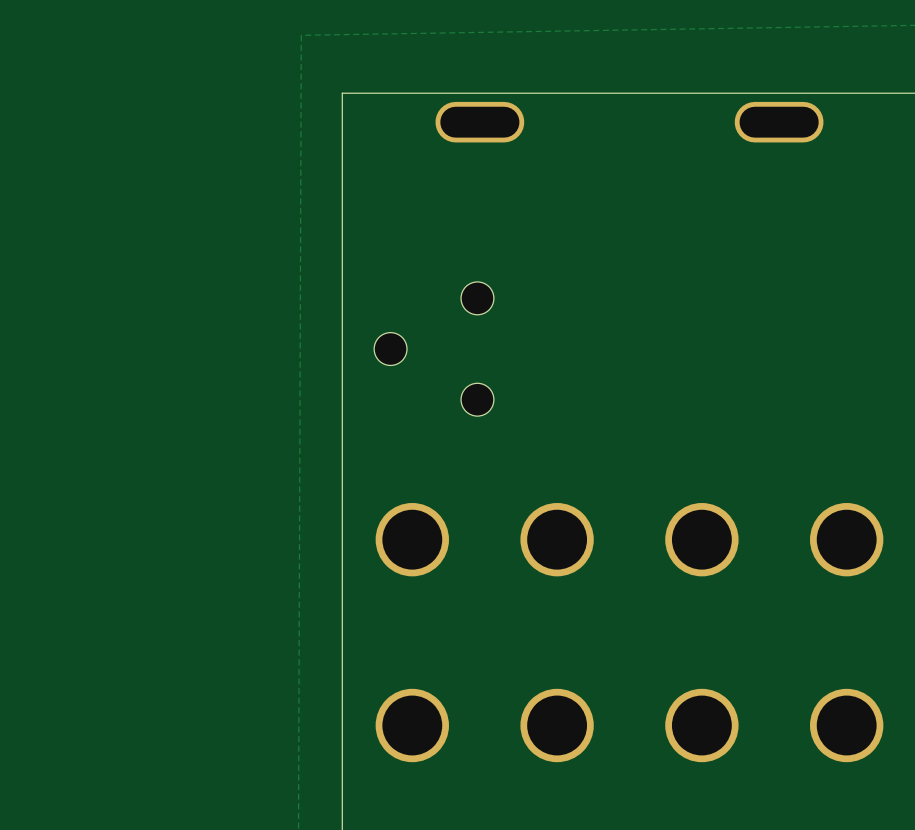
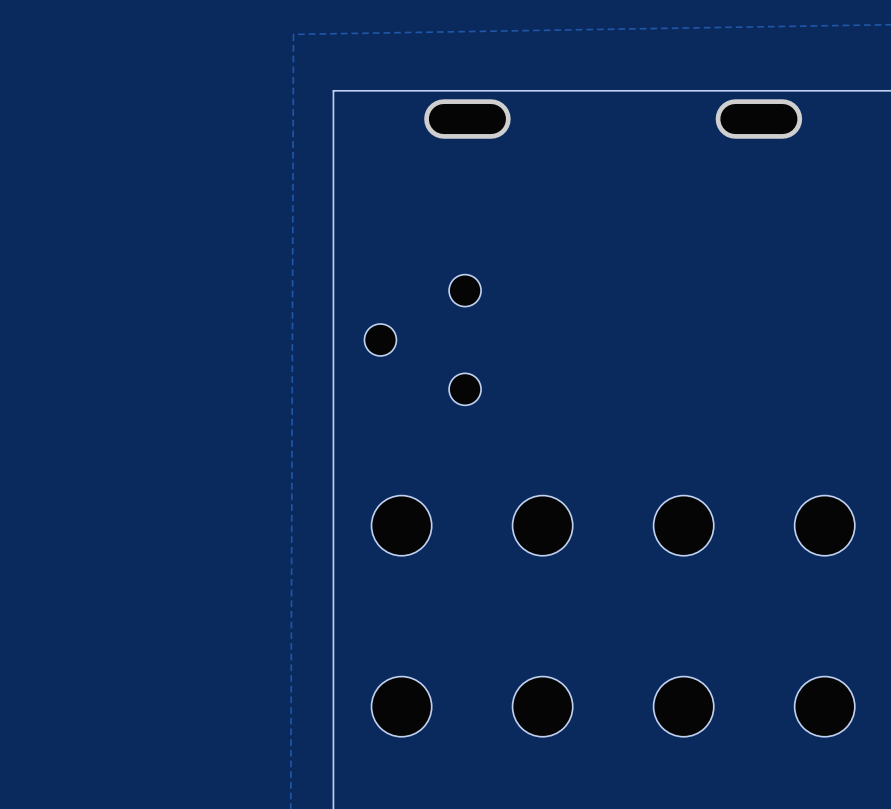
part footprint: [375, 503, 449, 577] -> [371, 495, 432, 556]
part footprint: [520, 503, 594, 577] -> [512, 495, 573, 556]
part footprint: [665, 503, 739, 577] -> [653, 495, 714, 556]
part footprint: [810, 503, 884, 577] -> [794, 495, 855, 556]
part footprint: [375, 688, 449, 763] -> [371, 676, 432, 737]
part footprint: [520, 688, 594, 763] -> [512, 676, 573, 737]
part footprint: [665, 688, 739, 763] -> [653, 676, 714, 737]
part footprint: [810, 688, 884, 763] -> [794, 676, 855, 737]

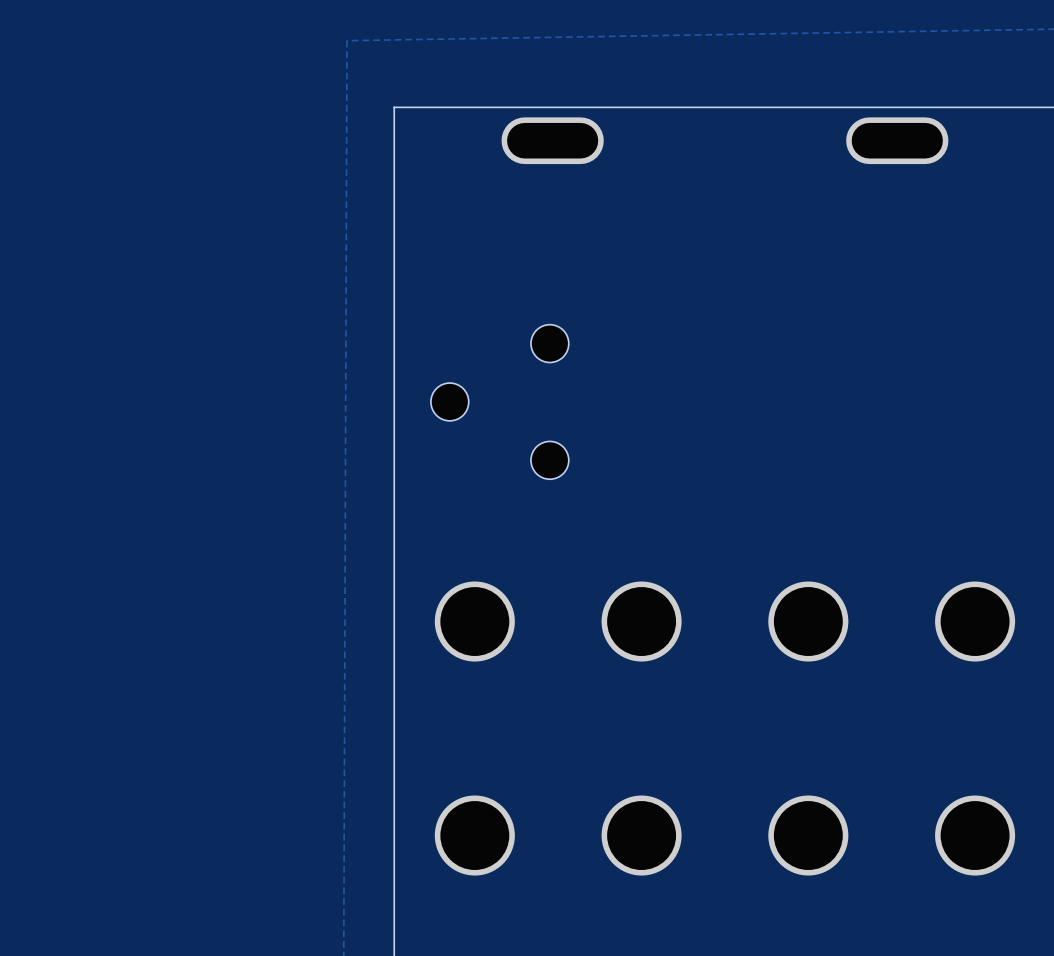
part footprint: [371, 495, 432, 556] -> [434, 581, 515, 662]
part footprint: [512, 495, 573, 556] -> [601, 581, 682, 662]
part footprint: [653, 495, 714, 556] -> [768, 581, 849, 662]
part footprint: [794, 495, 855, 556] -> [935, 581, 1016, 662]
part footprint: [371, 676, 432, 737] -> [434, 795, 515, 876]
part footprint: [512, 676, 573, 737] -> [601, 795, 682, 876]
part footprint: [653, 676, 714, 737] -> [768, 795, 849, 876]
part footprint: [794, 676, 855, 737] -> [935, 795, 1016, 876]

